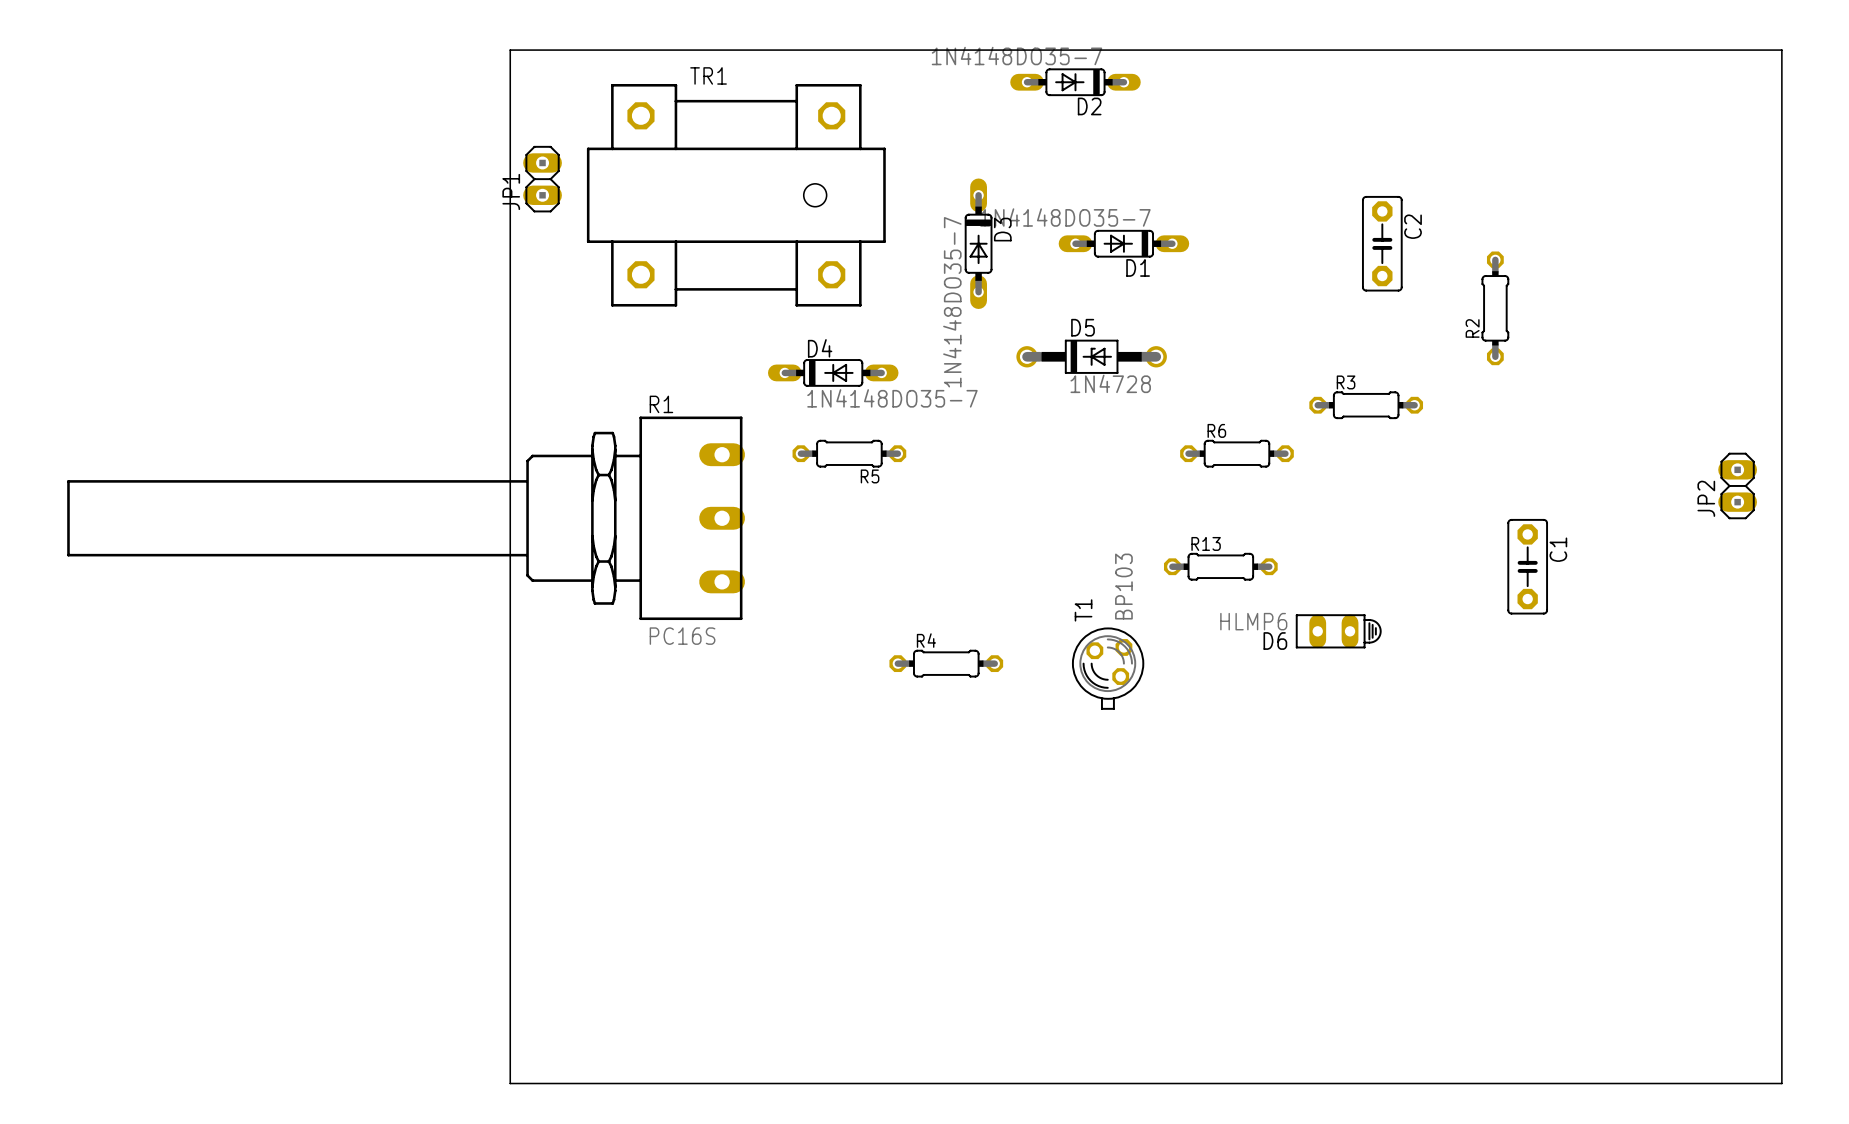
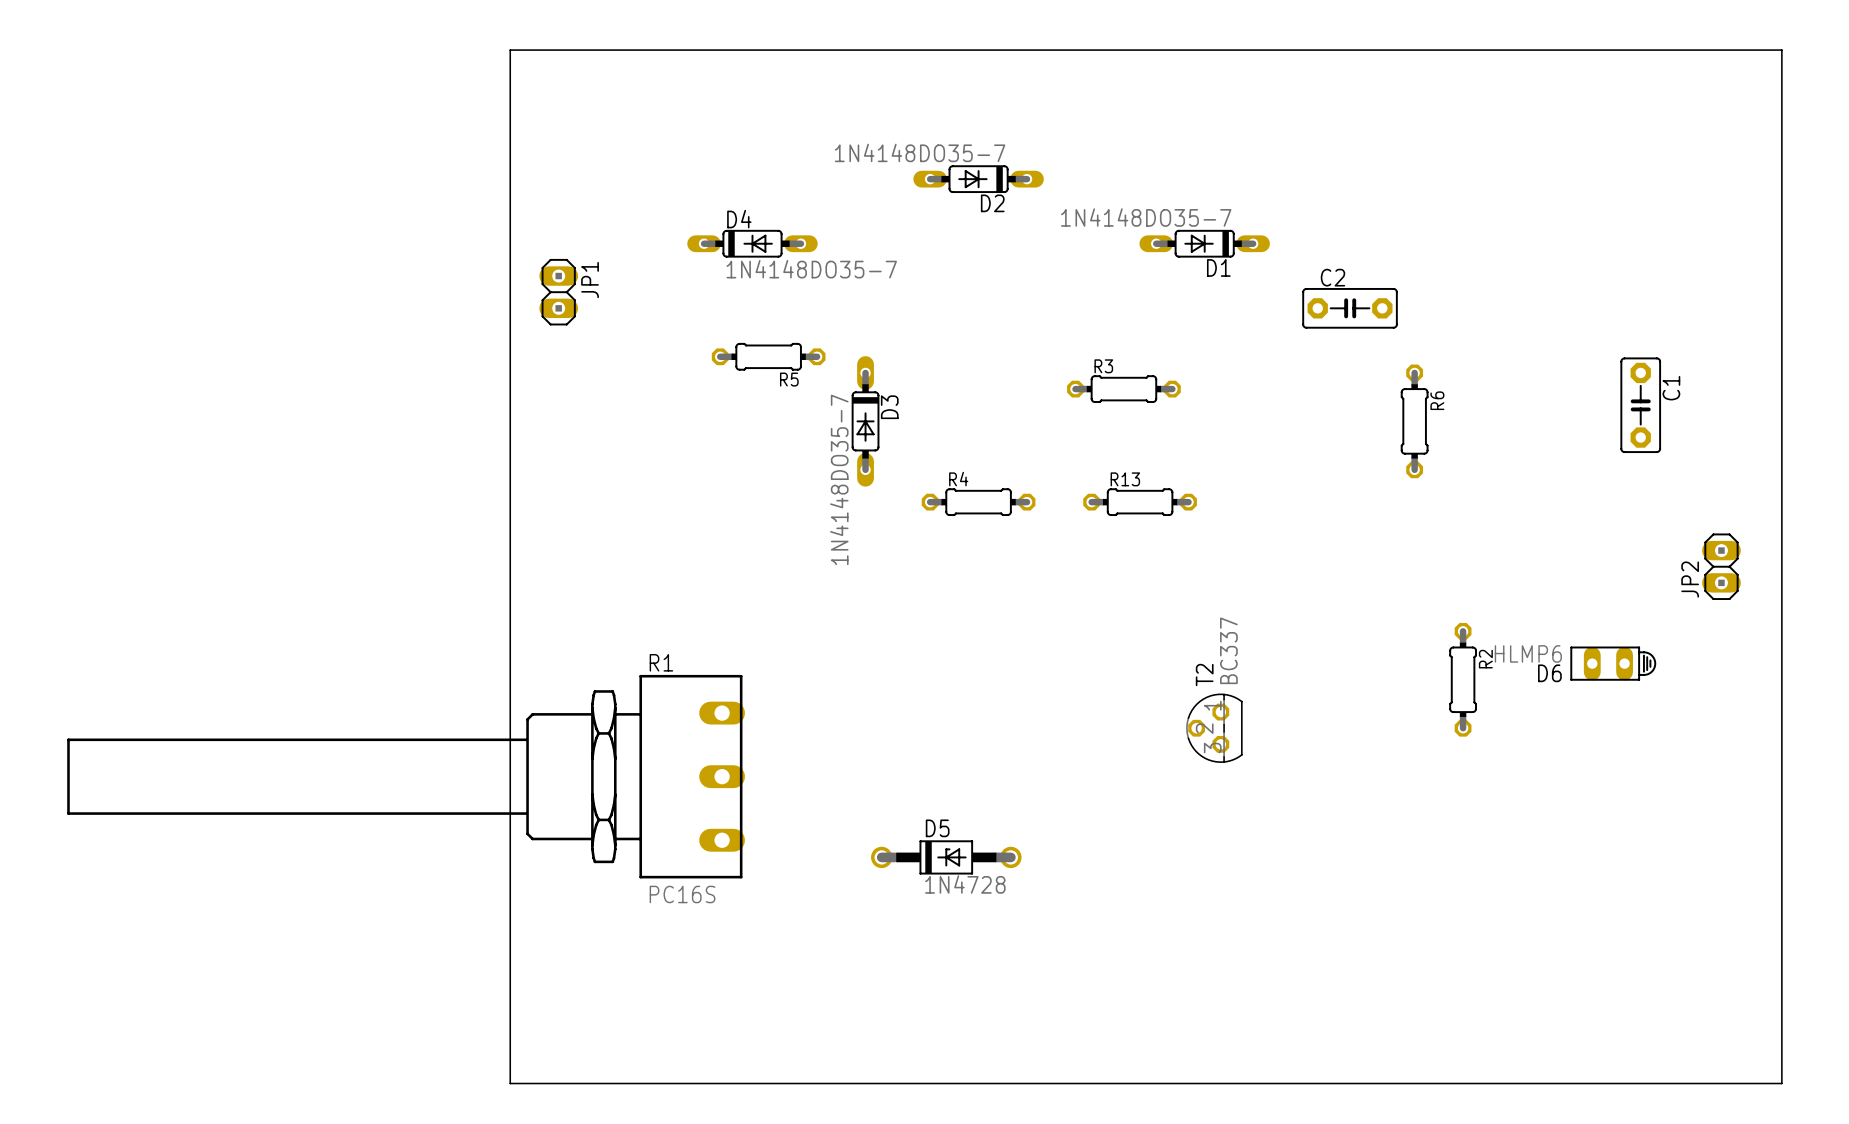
D2 position: (1075, 82) -> (978, 179)
JP1 position: (542, 179) -> (558, 292)
JP1 name position: JP1 (511, 191) -> JP1 (590, 280)
TR1: (736, 195) -> none
D3 position: (978, 243) -> (865, 421)
D1 position: (1123, 243) -> (1204, 243)
C2 rotation: 0° (1382, 243) -> 90° counterclockwise (1350, 308)
C2 position: (1382, 243) -> (1350, 308)
R2 position: (1495, 308) -> (1463, 679)
R2 name position: R2 (1472, 328) -> R2 (1485, 659)
D5 position: (1091, 356) -> (946, 857)
D4 position: (833, 372) -> (752, 243)
R3 position: (1366, 405) -> (1123, 389)
R5 position: (849, 453) -> (768, 356)
R6 rotation: 0° (1236, 453) -> 90° clockwise (1414, 421)
R6 position: (1236, 453) -> (1414, 421)
JP2 position: (1737, 485) -> (1721, 566)
R1 position: (406, 518) -> (406, 776)
R13 position: (1220, 566) -> (1140, 502)
C1 position: (1527, 566) -> (1640, 405)
D6 position: (1338, 631) -> (1613, 663)
R4 position: (946, 663) -> (978, 502)
T1: BP103 (1108, 668) -> none
T2: none -> BC337 (1214, 728)

